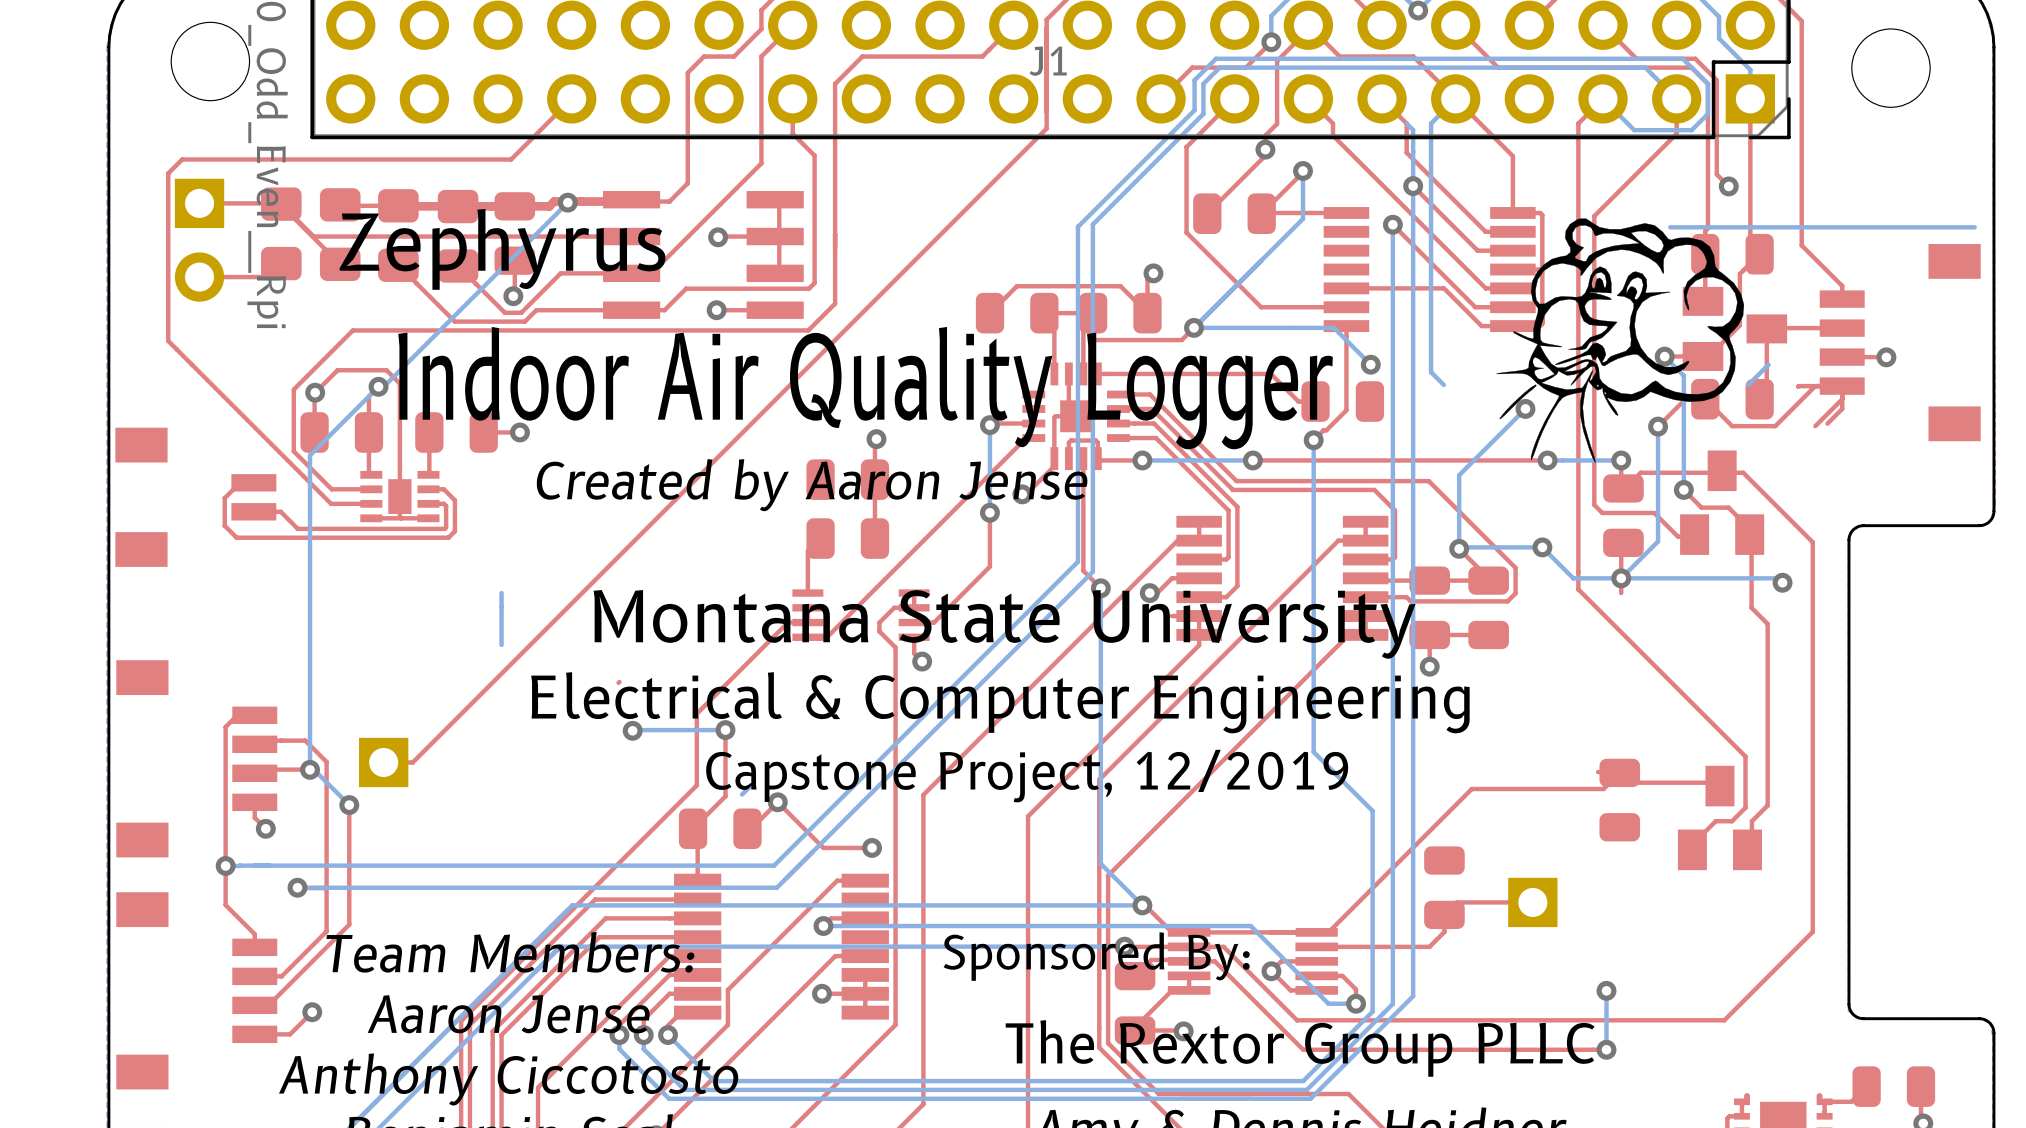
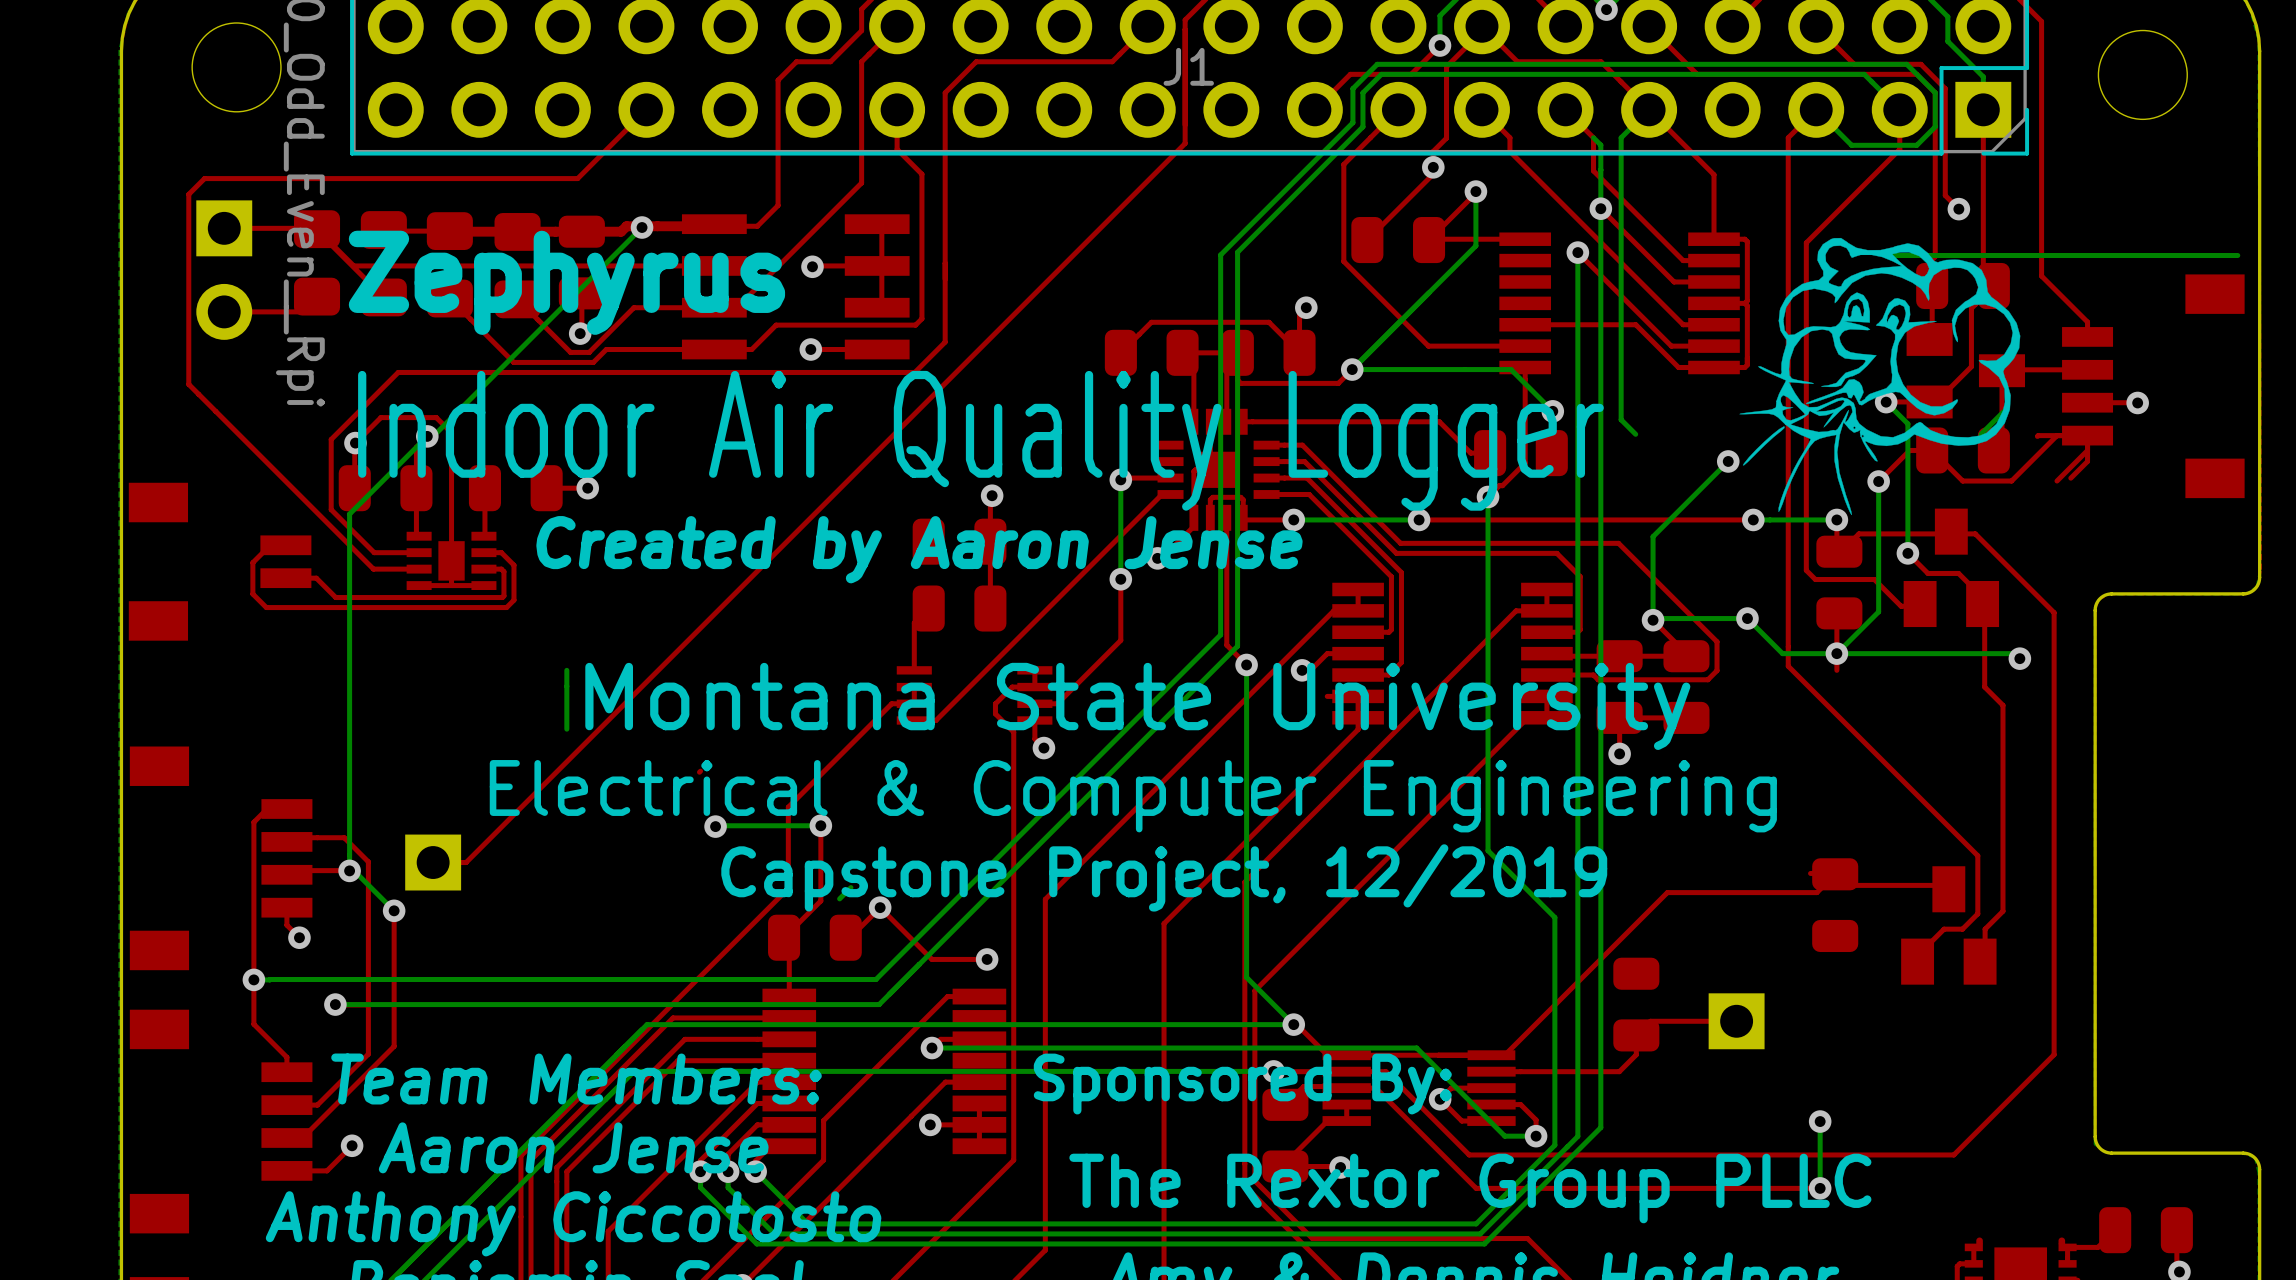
drawing position: (1620, 340) -> (1879, 376)

